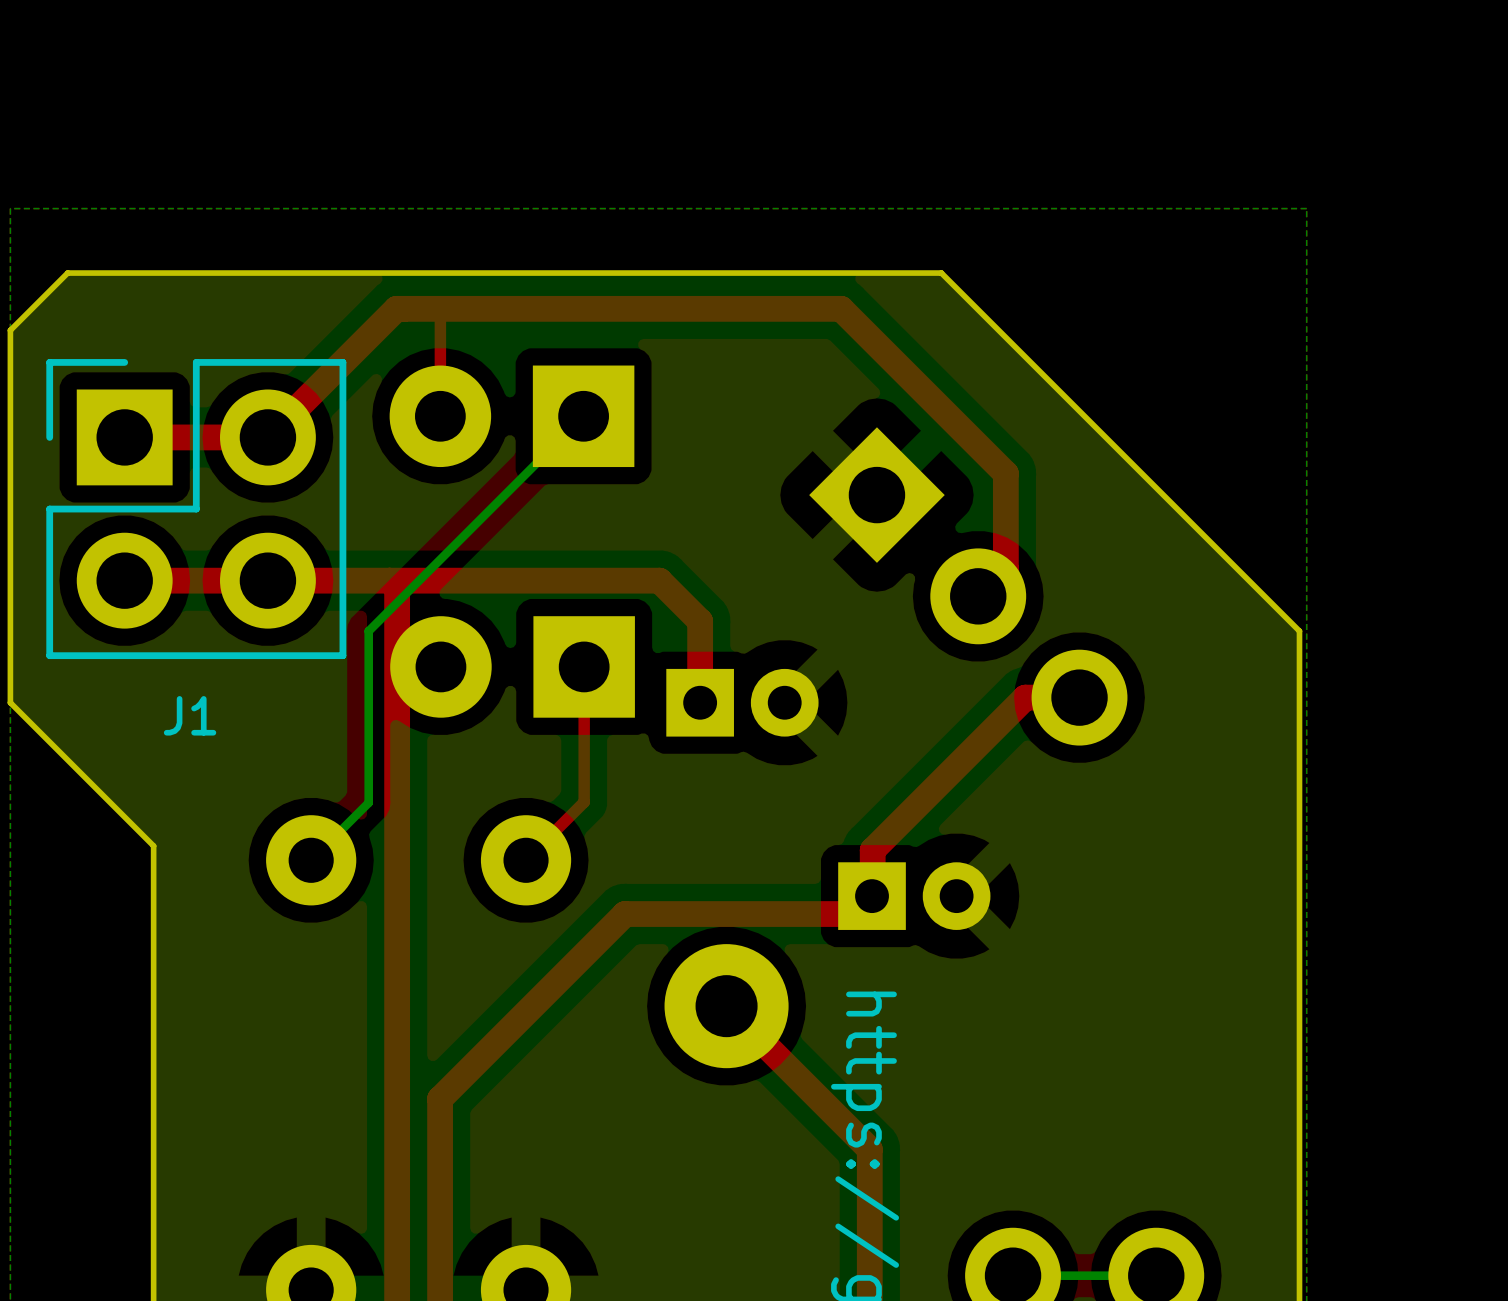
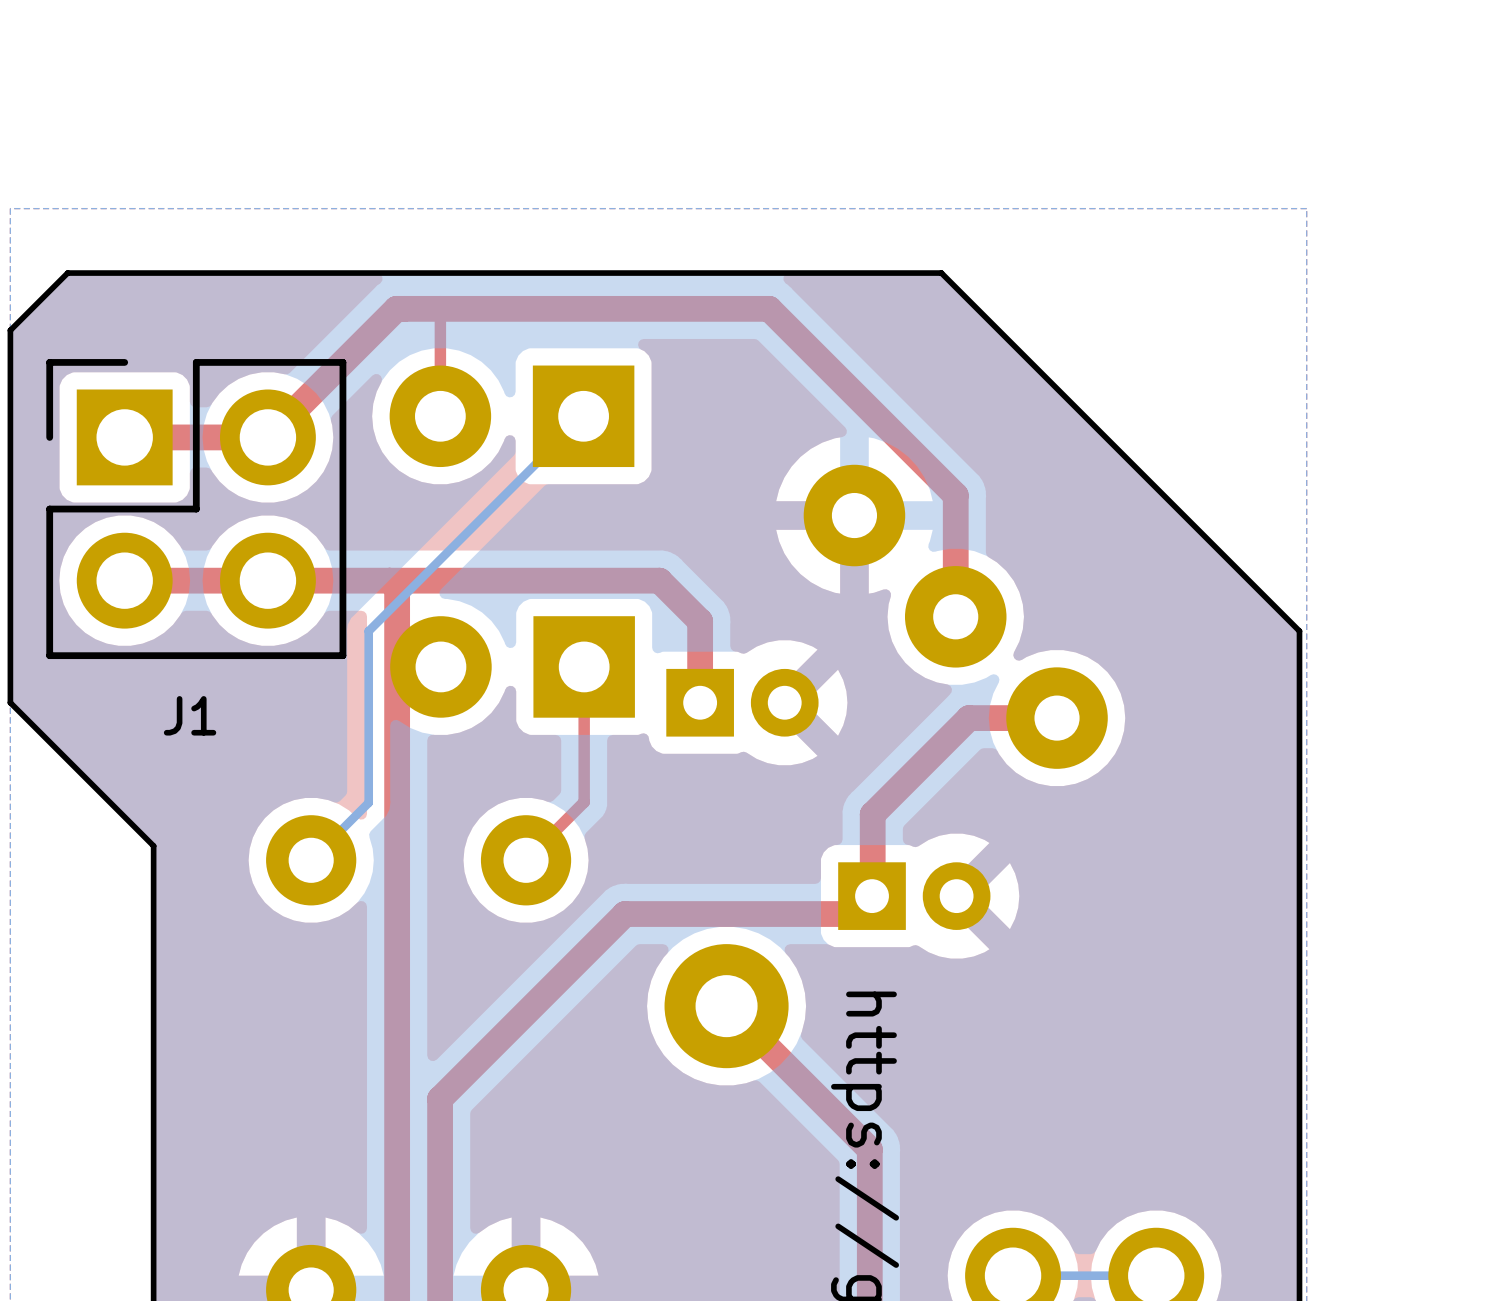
top track: (769, 308) (841, 308) (1005, 473) (1005, 568) (978, 596) -> (769, 308) (955, 495) (955, 616)
part footprint: [809, 427, 1128, 746] -> [803, 464, 1108, 769]
top track: (1079, 697) (1025, 697) (872, 850) -> (1057, 718) (969, 718) (872, 814) (872, 850)

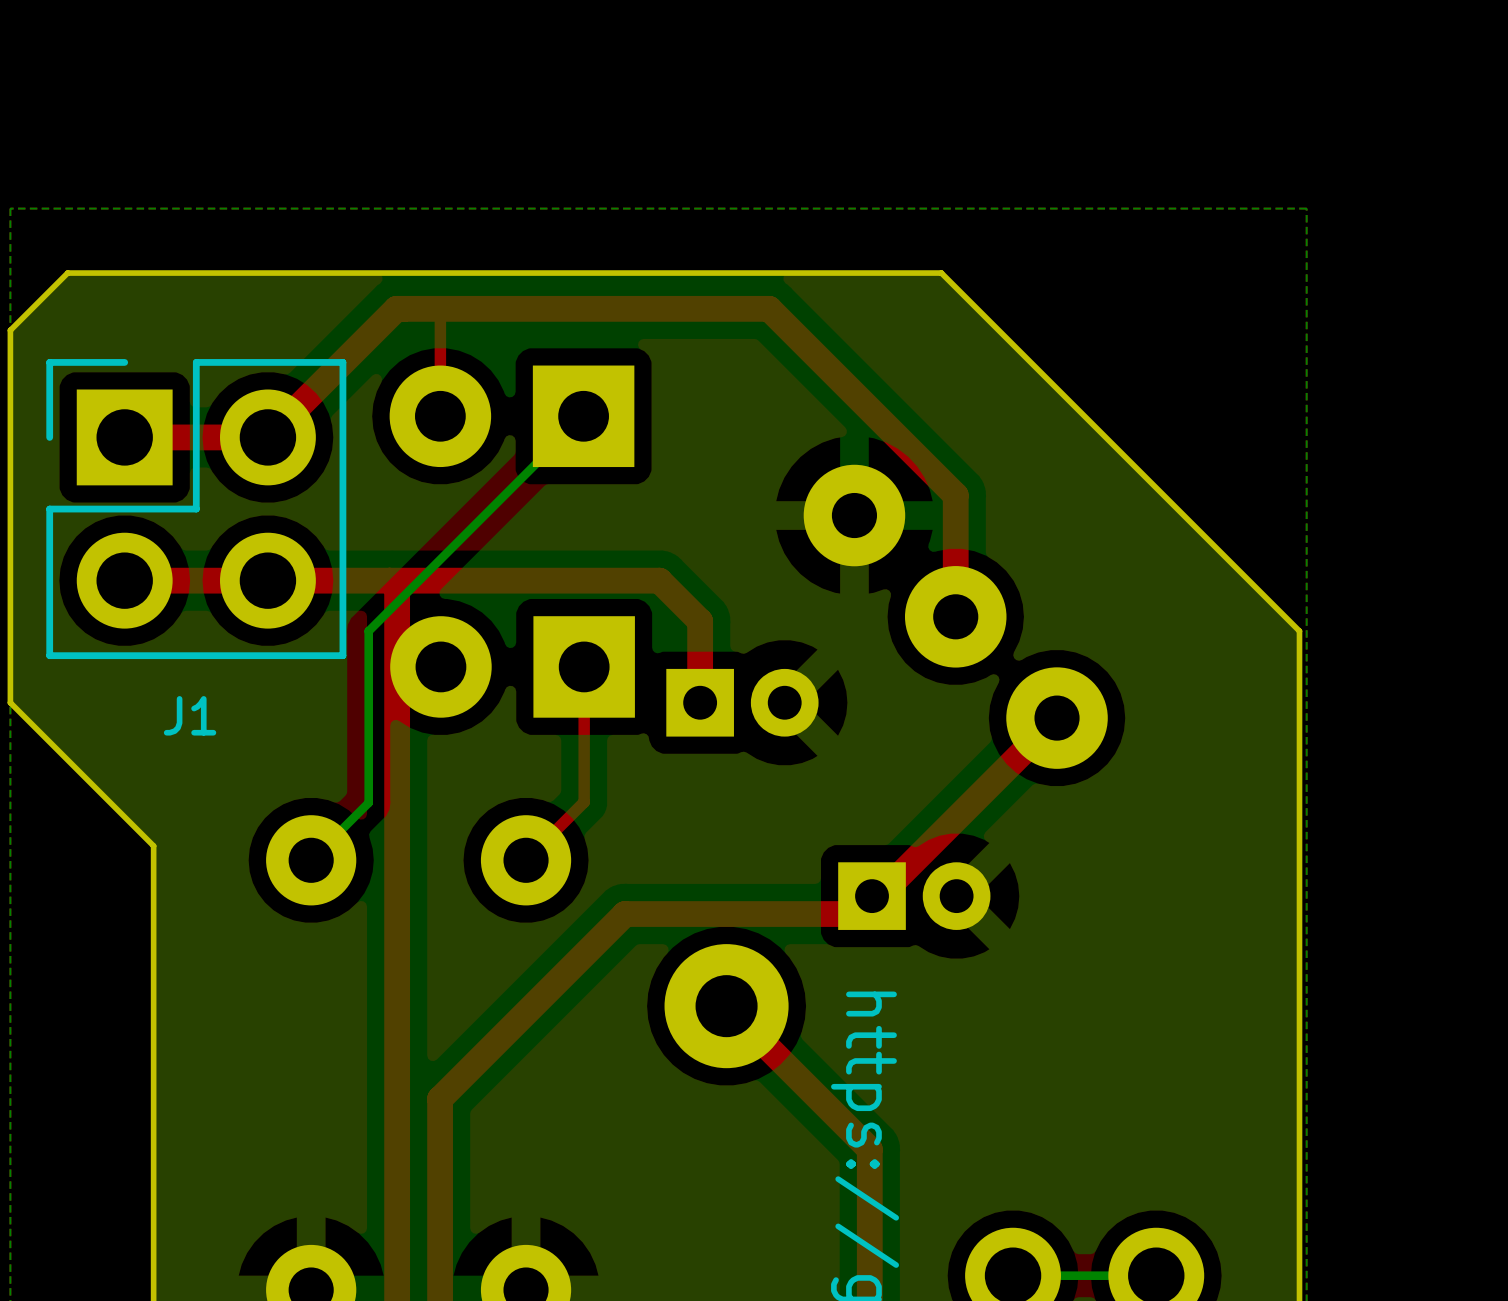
top track: (1057, 718) (969, 718) (872, 814) (872, 902) -> (1057, 718) (872, 902)

